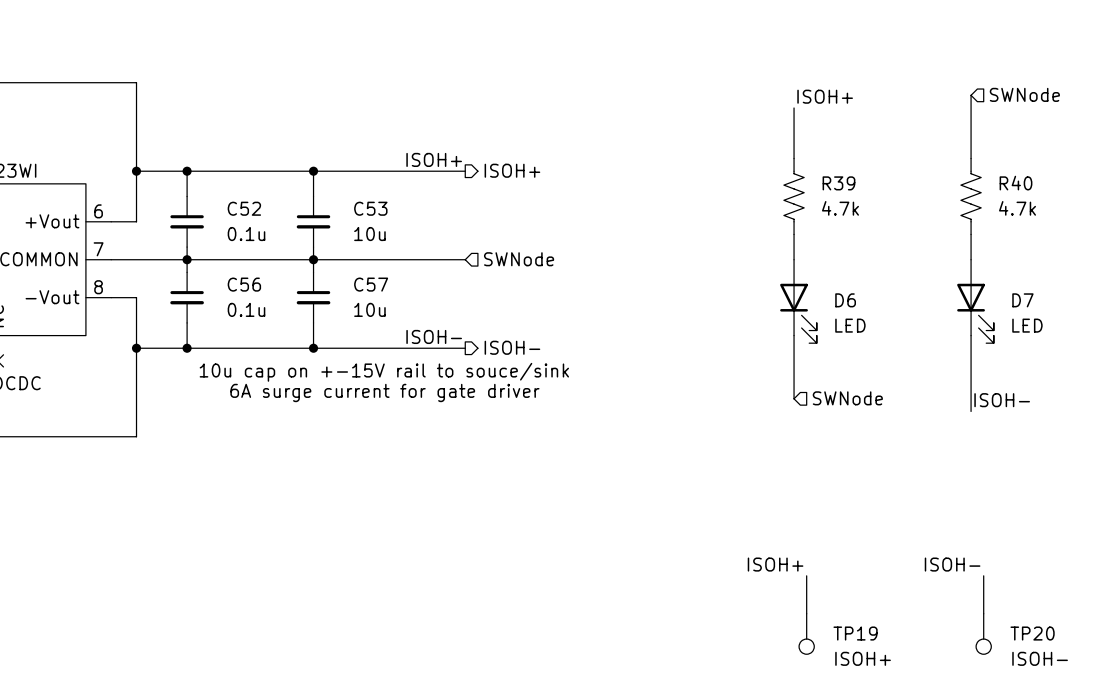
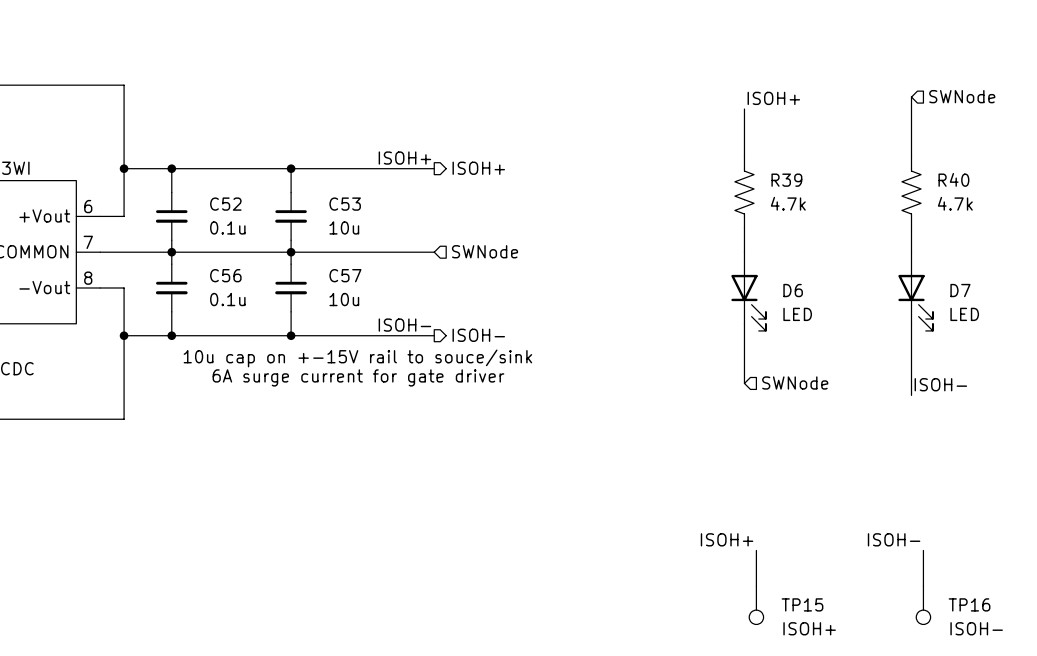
TP19 name: TP19 (855, 633) -> TP15 (802, 604)
TP20 name: TP20 (1032, 633) -> TP16 (969, 604)

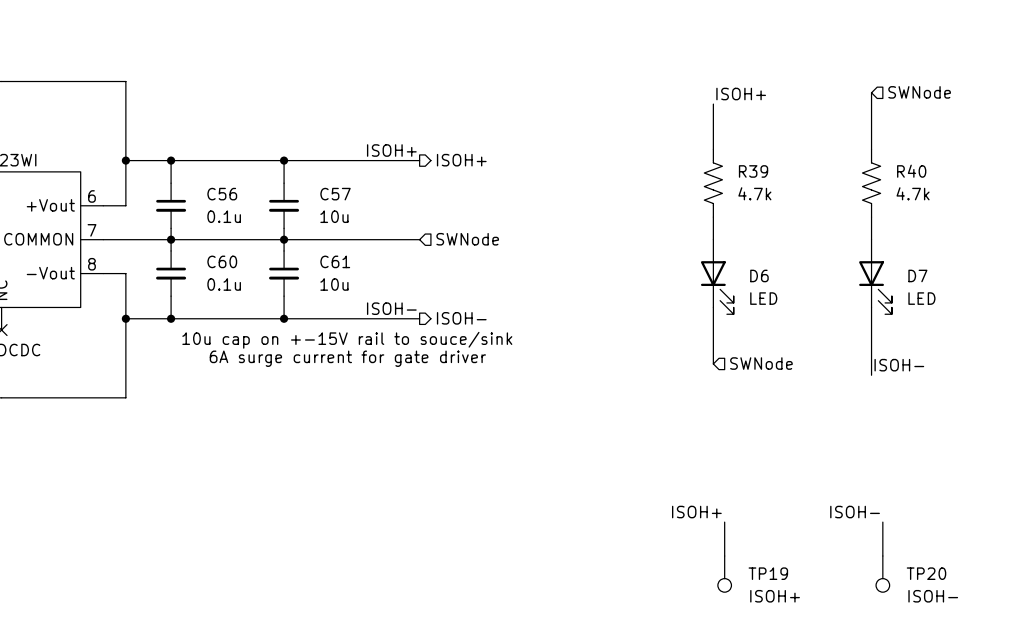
C52 name: C52 (225, 204) -> C56 (222, 194)
C53 name: C53 (345, 204) -> C57 (335, 194)
C56 name: C56 (225, 275) -> C60 (222, 261)
C57 name: C57 (345, 275) -> C61 (335, 261)
TP15 name: TP15 (802, 604) -> TP19 (768, 573)
TP16 name: TP16 (969, 604) -> TP20 (926, 573)

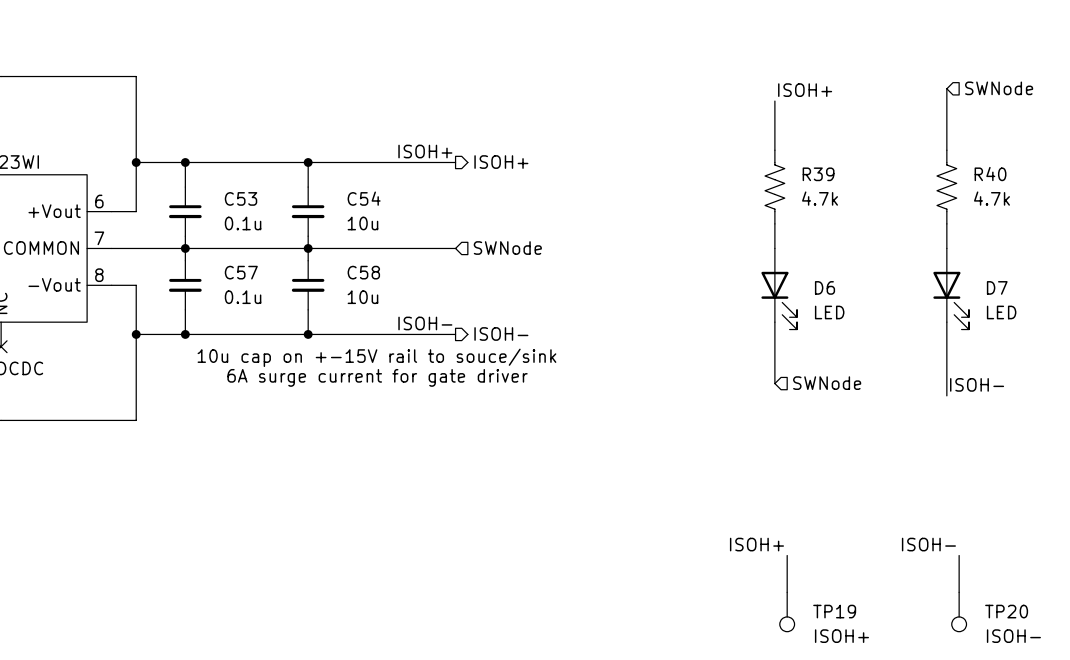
C56 name: C56 (222, 194) -> C53 (241, 198)
C57 name: C57 (335, 194) -> C54 (364, 198)
C60 name: C60 (222, 261) -> C57 (241, 272)
C61 name: C61 (335, 261) -> C58 (363, 272)

